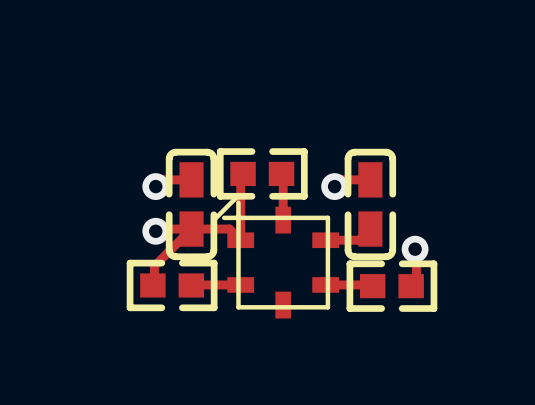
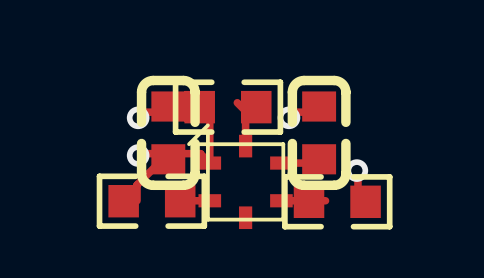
part footprint: [165, 148, 218, 261] -> [136, 75, 200, 191]
part footprint: [216, 148, 308, 200] -> [172, 79, 284, 135]
part footprint: [344, 148, 397, 261] -> [287, 75, 351, 191]
part footprint: [126, 259, 218, 312] -> [96, 173, 208, 229]
part footprint: [346, 260, 438, 312] -> [282, 174, 393, 230]

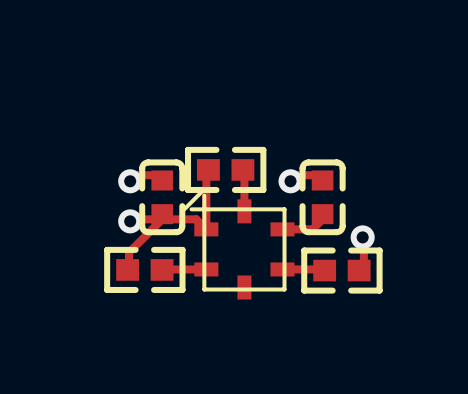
part footprint: [136, 75, 200, 191] -> [139, 159, 186, 236]
part footprint: [287, 75, 351, 191] -> [299, 159, 346, 236]
part footprint: [172, 79, 284, 135] -> [185, 146, 267, 193]
part footprint: [96, 173, 208, 229] -> [104, 246, 186, 293]
part footprint: [282, 174, 393, 230] -> [301, 247, 383, 294]

